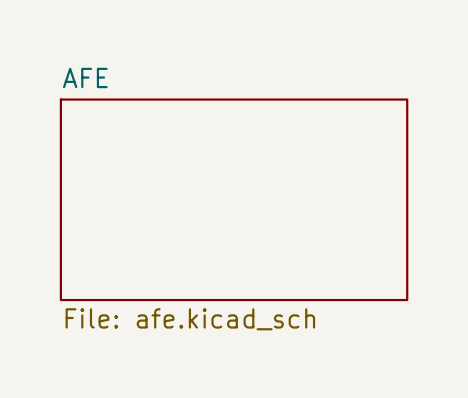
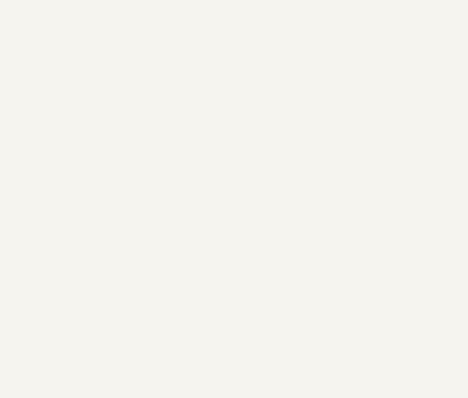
sheet AFE: File: afe.kicad_sch (234, 199) -> none

